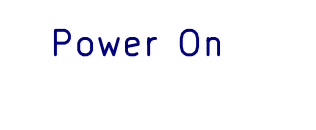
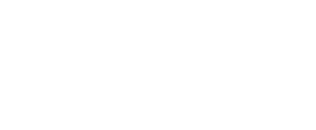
text: Power On (136, 42) -> none

